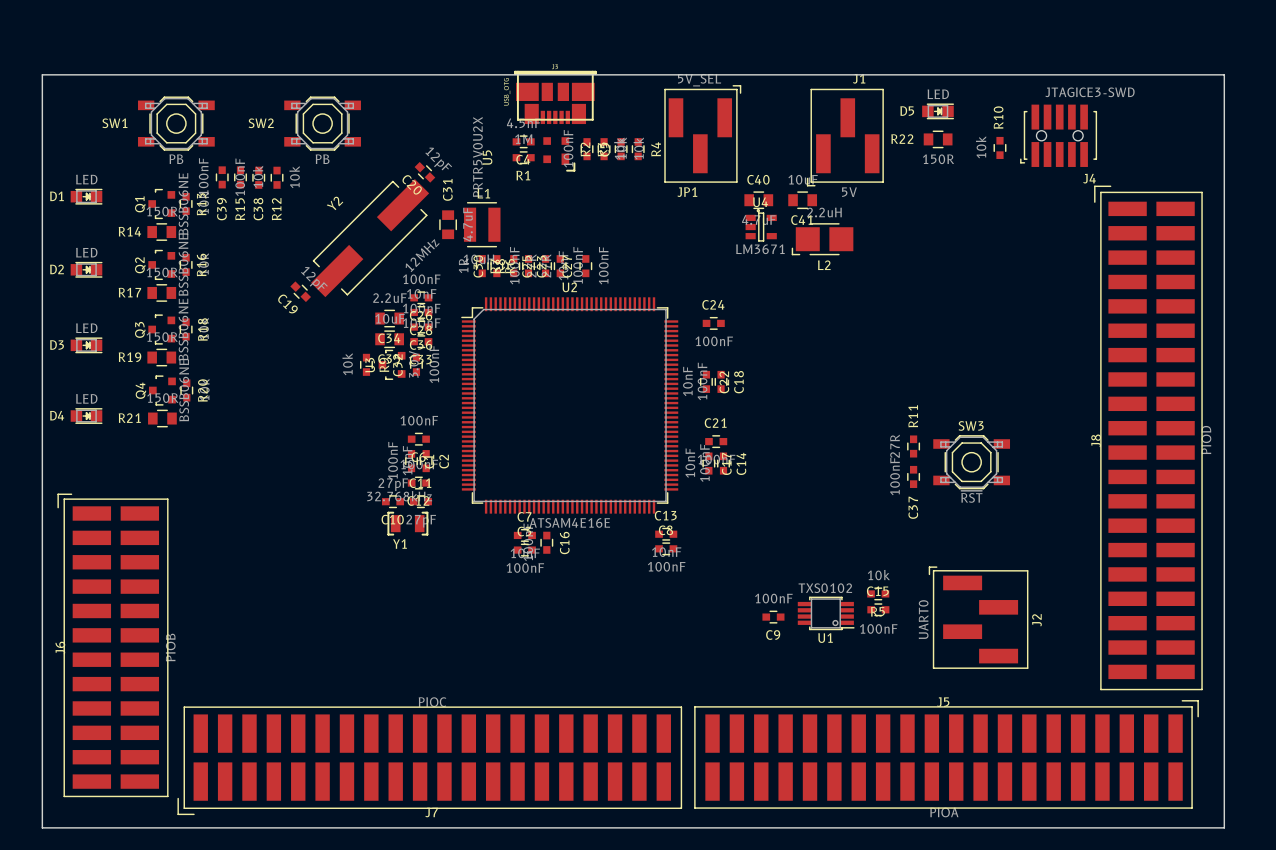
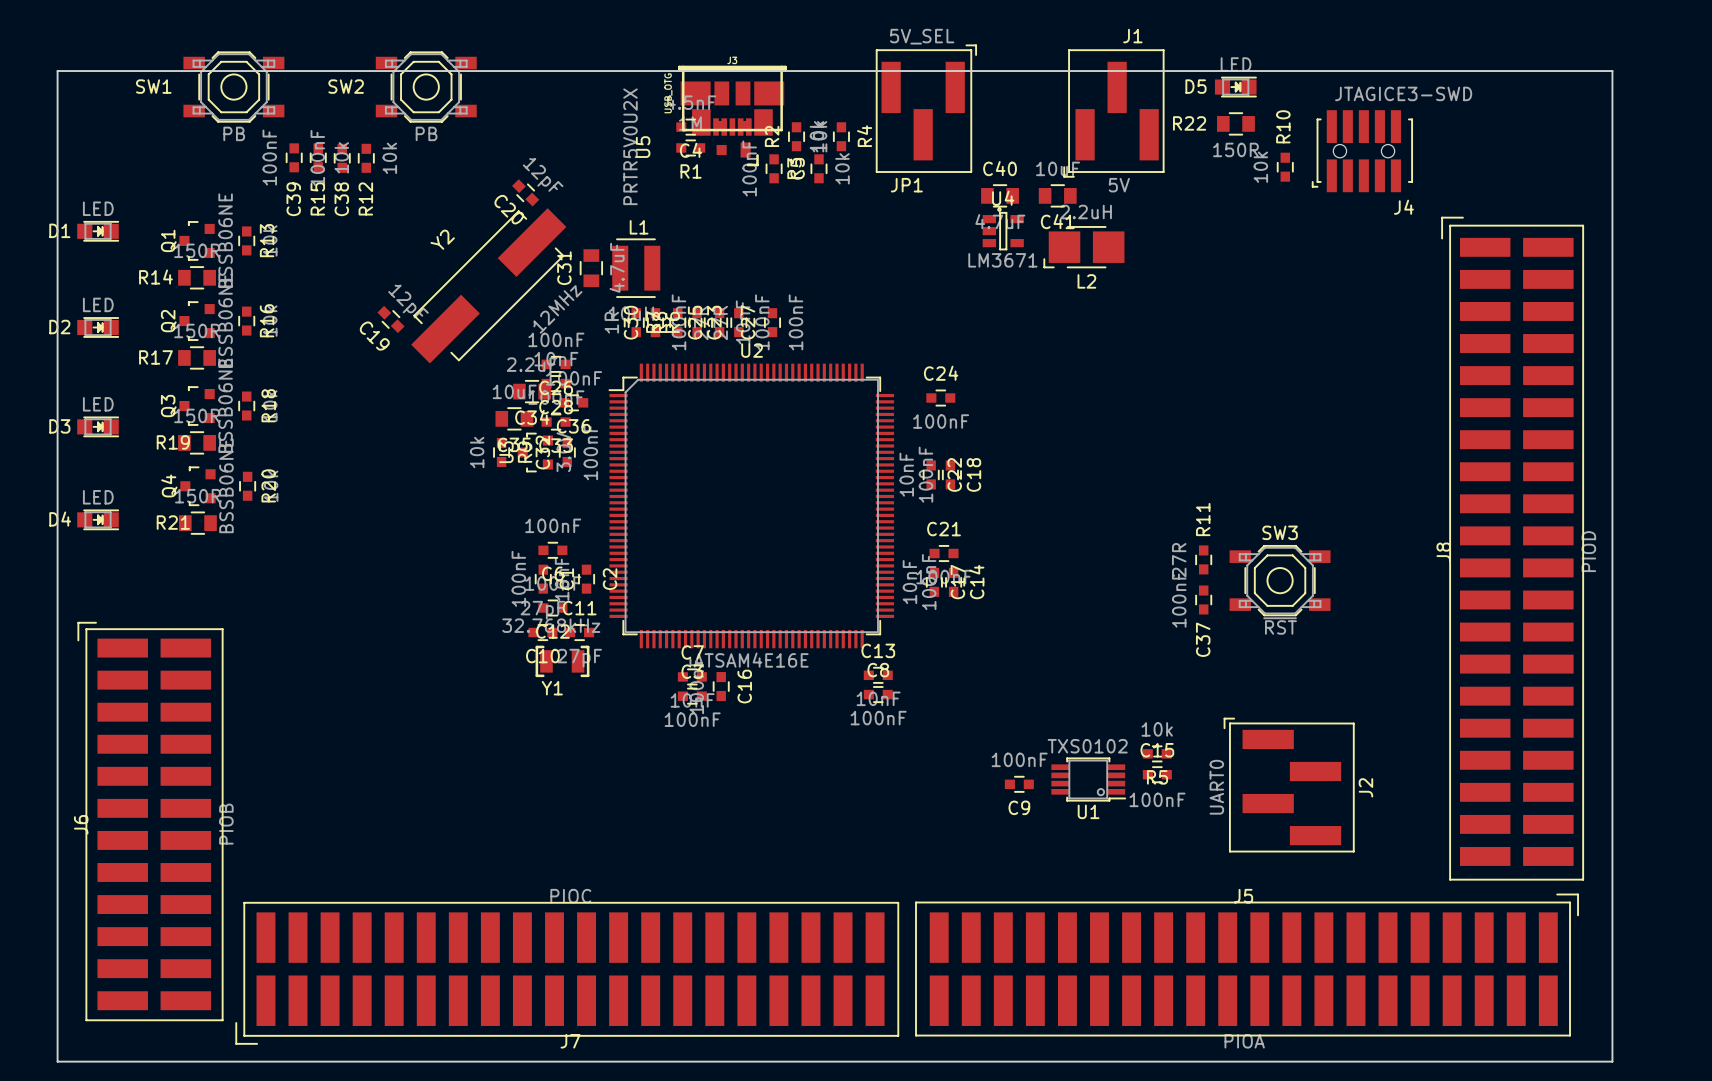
D5 position: (938, 111) -> (1235, 87)
SW1 position: (176, 123) -> (233, 87)
SW2 position: (322, 123) -> (426, 87)
JP1 position: (702, 133) -> (926, 108)
J4 position: (1058, 135) -> (1362, 151)
J1 position: (845, 137) -> (1113, 113)
R22 position: (938, 139) -> (1235, 123)
C4 position: (523, 141) -> (690, 127)
R10 position: (999, 147) -> (1285, 167)
R2 position: (604, 149) -> (796, 136)
R4 position: (638, 149) -> (841, 136)
U5 position: (559, 154) -> (737, 143)
R1 position: (523, 157) -> (690, 147)
C20 position: (424, 172) -> (525, 192)
C39 position: (222, 177) -> (294, 157)
R15 position: (240, 177) -> (318, 157)
C38 position: (258, 177) -> (342, 158)
R12 position: (277, 177) -> (366, 158)
C31 name position: C31 (447, 189) -> C31 (564, 268)
D1 position: (86, 196) -> (98, 231)
C40 position: (758, 200) -> (1000, 195)
C41 position: (802, 200) -> (1057, 195)
Q1 position: (161, 204) -> (197, 240)
U4 position: (761, 225) -> (1003, 228)
R14 position: (161, 232) -> (197, 277)
L2 position: (822, 239) -> (1083, 247)
Q2 position: (161, 264) -> (197, 321)
D2 position: (86, 269) -> (98, 327)
C19 position: (300, 291) -> (391, 319)
R17 position: (161, 292) -> (197, 357)
C34 position: (389, 318) -> (532, 391)
C36 position: (421, 327) -> (573, 402)
Q3 position: (161, 329) -> (197, 406)
D3 position: (86, 345) -> (98, 426)
R19 position: (161, 357) -> (197, 442)
R9 position: (366, 364) -> (501, 452)
U3 position: (392, 364) -> (535, 452)
C32 position: (416, 364) -> (567, 452)
Q4 position: (162, 390) -> (197, 486)
D4 position: (86, 416) -> (98, 519)
R21 position: (162, 418) -> (197, 523)
C2 position: (426, 461) -> (586, 579)
C10 position: (393, 501) -> (542, 632)
C11 position: (420, 501) -> (579, 632)
Y1 position: (407, 523) -> (562, 661)

